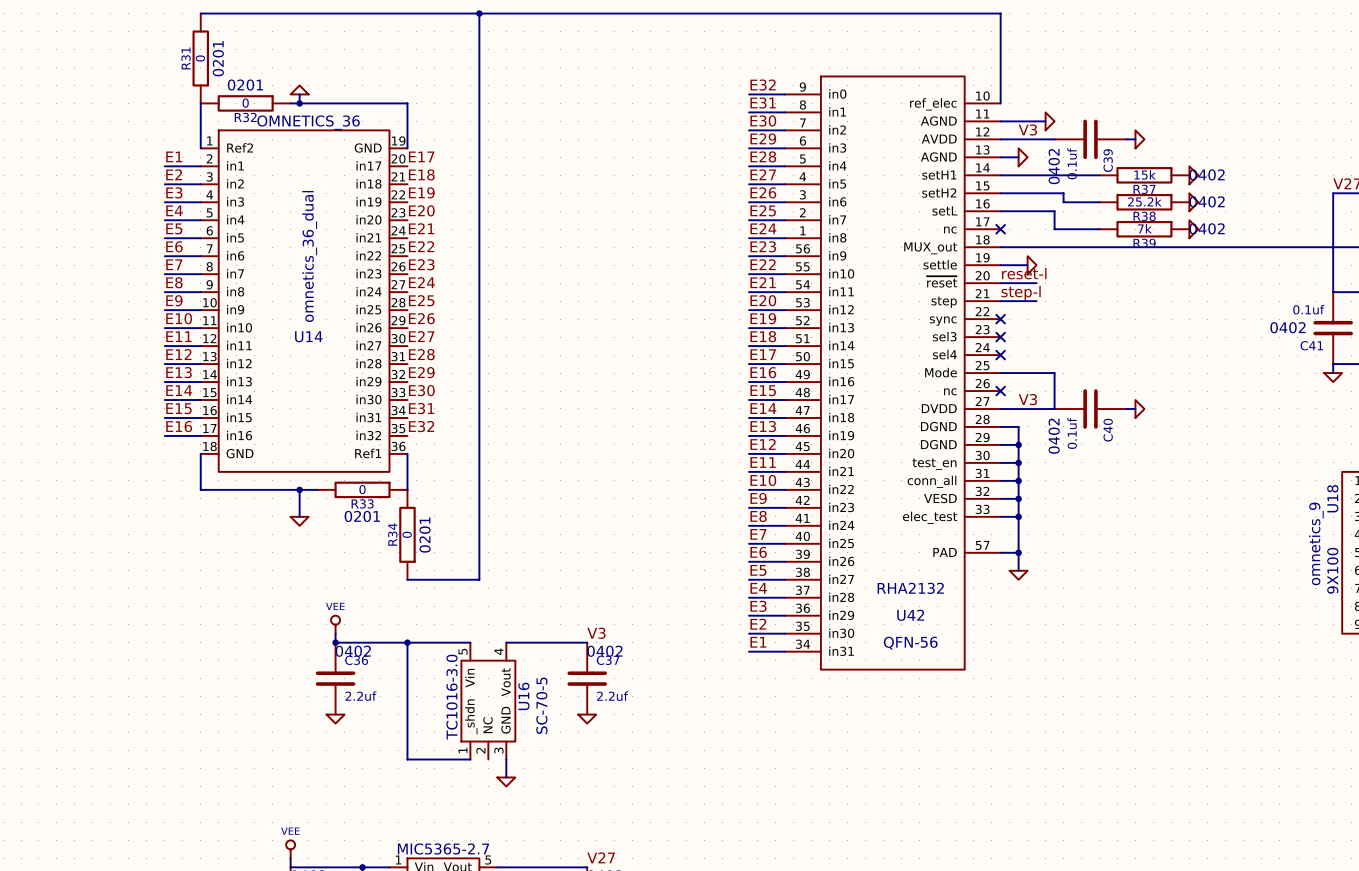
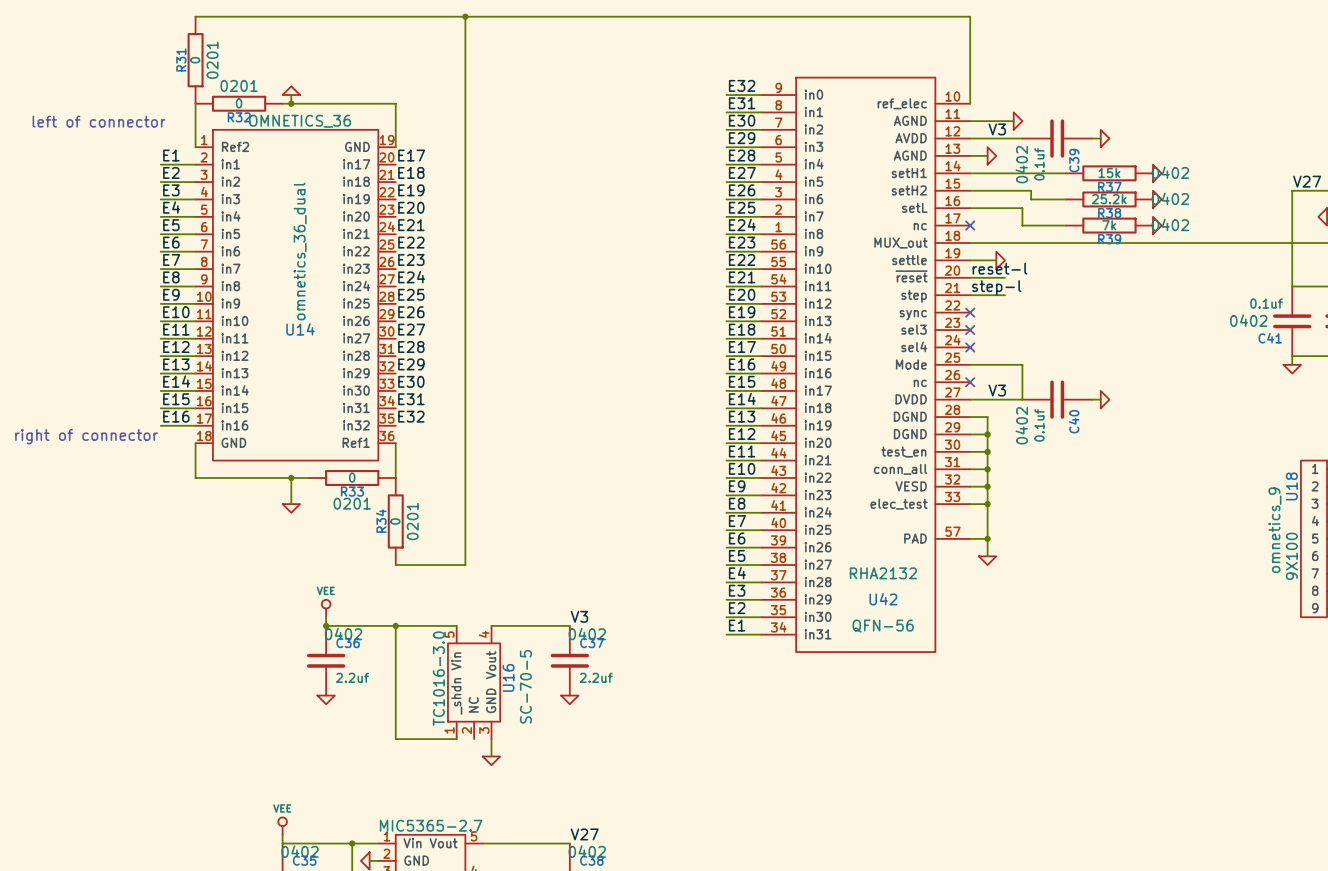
text: none -> left of connector (99, 121)
text: none -> right of connector (86, 436)

